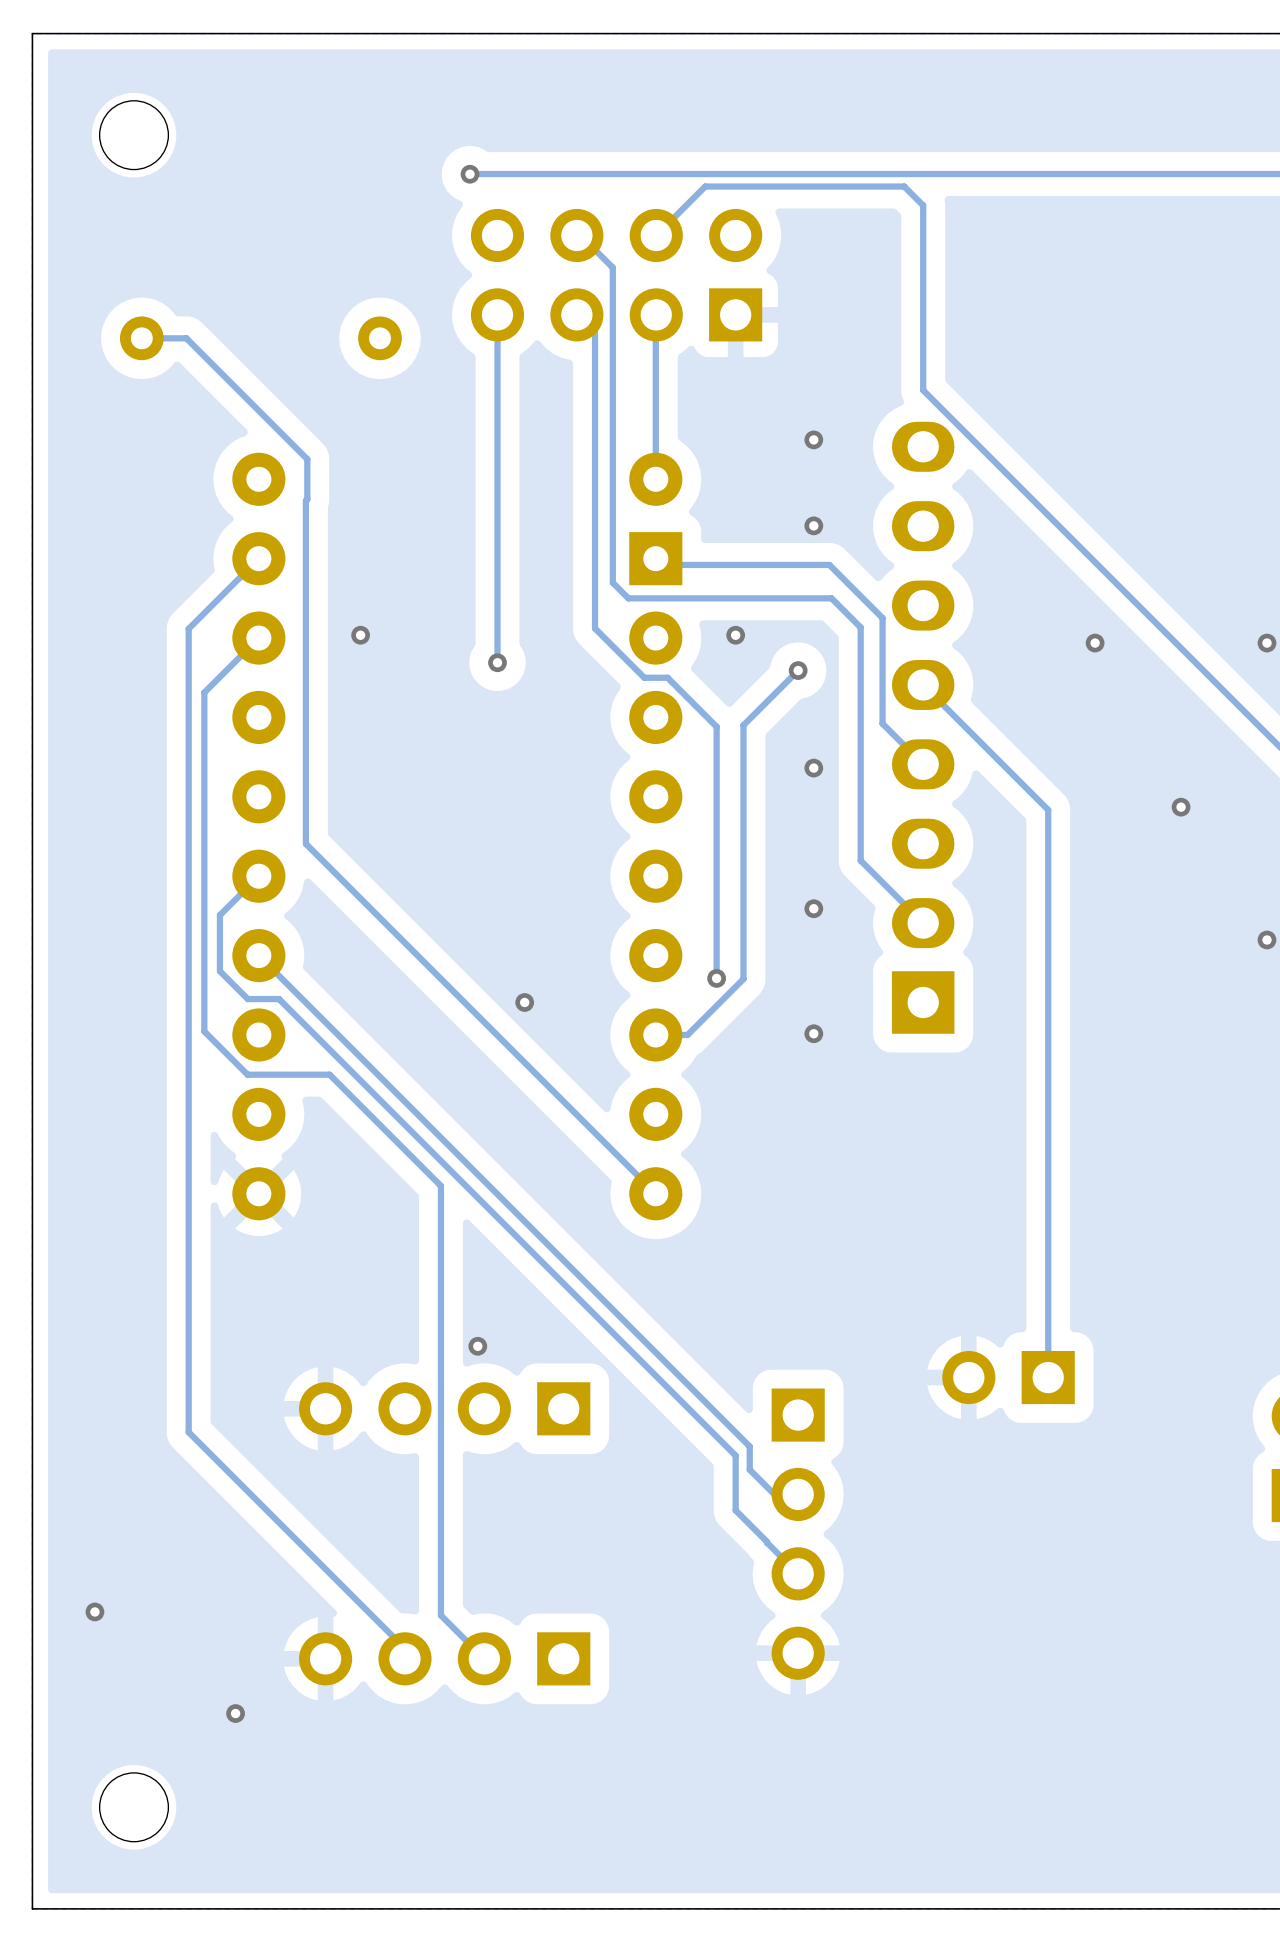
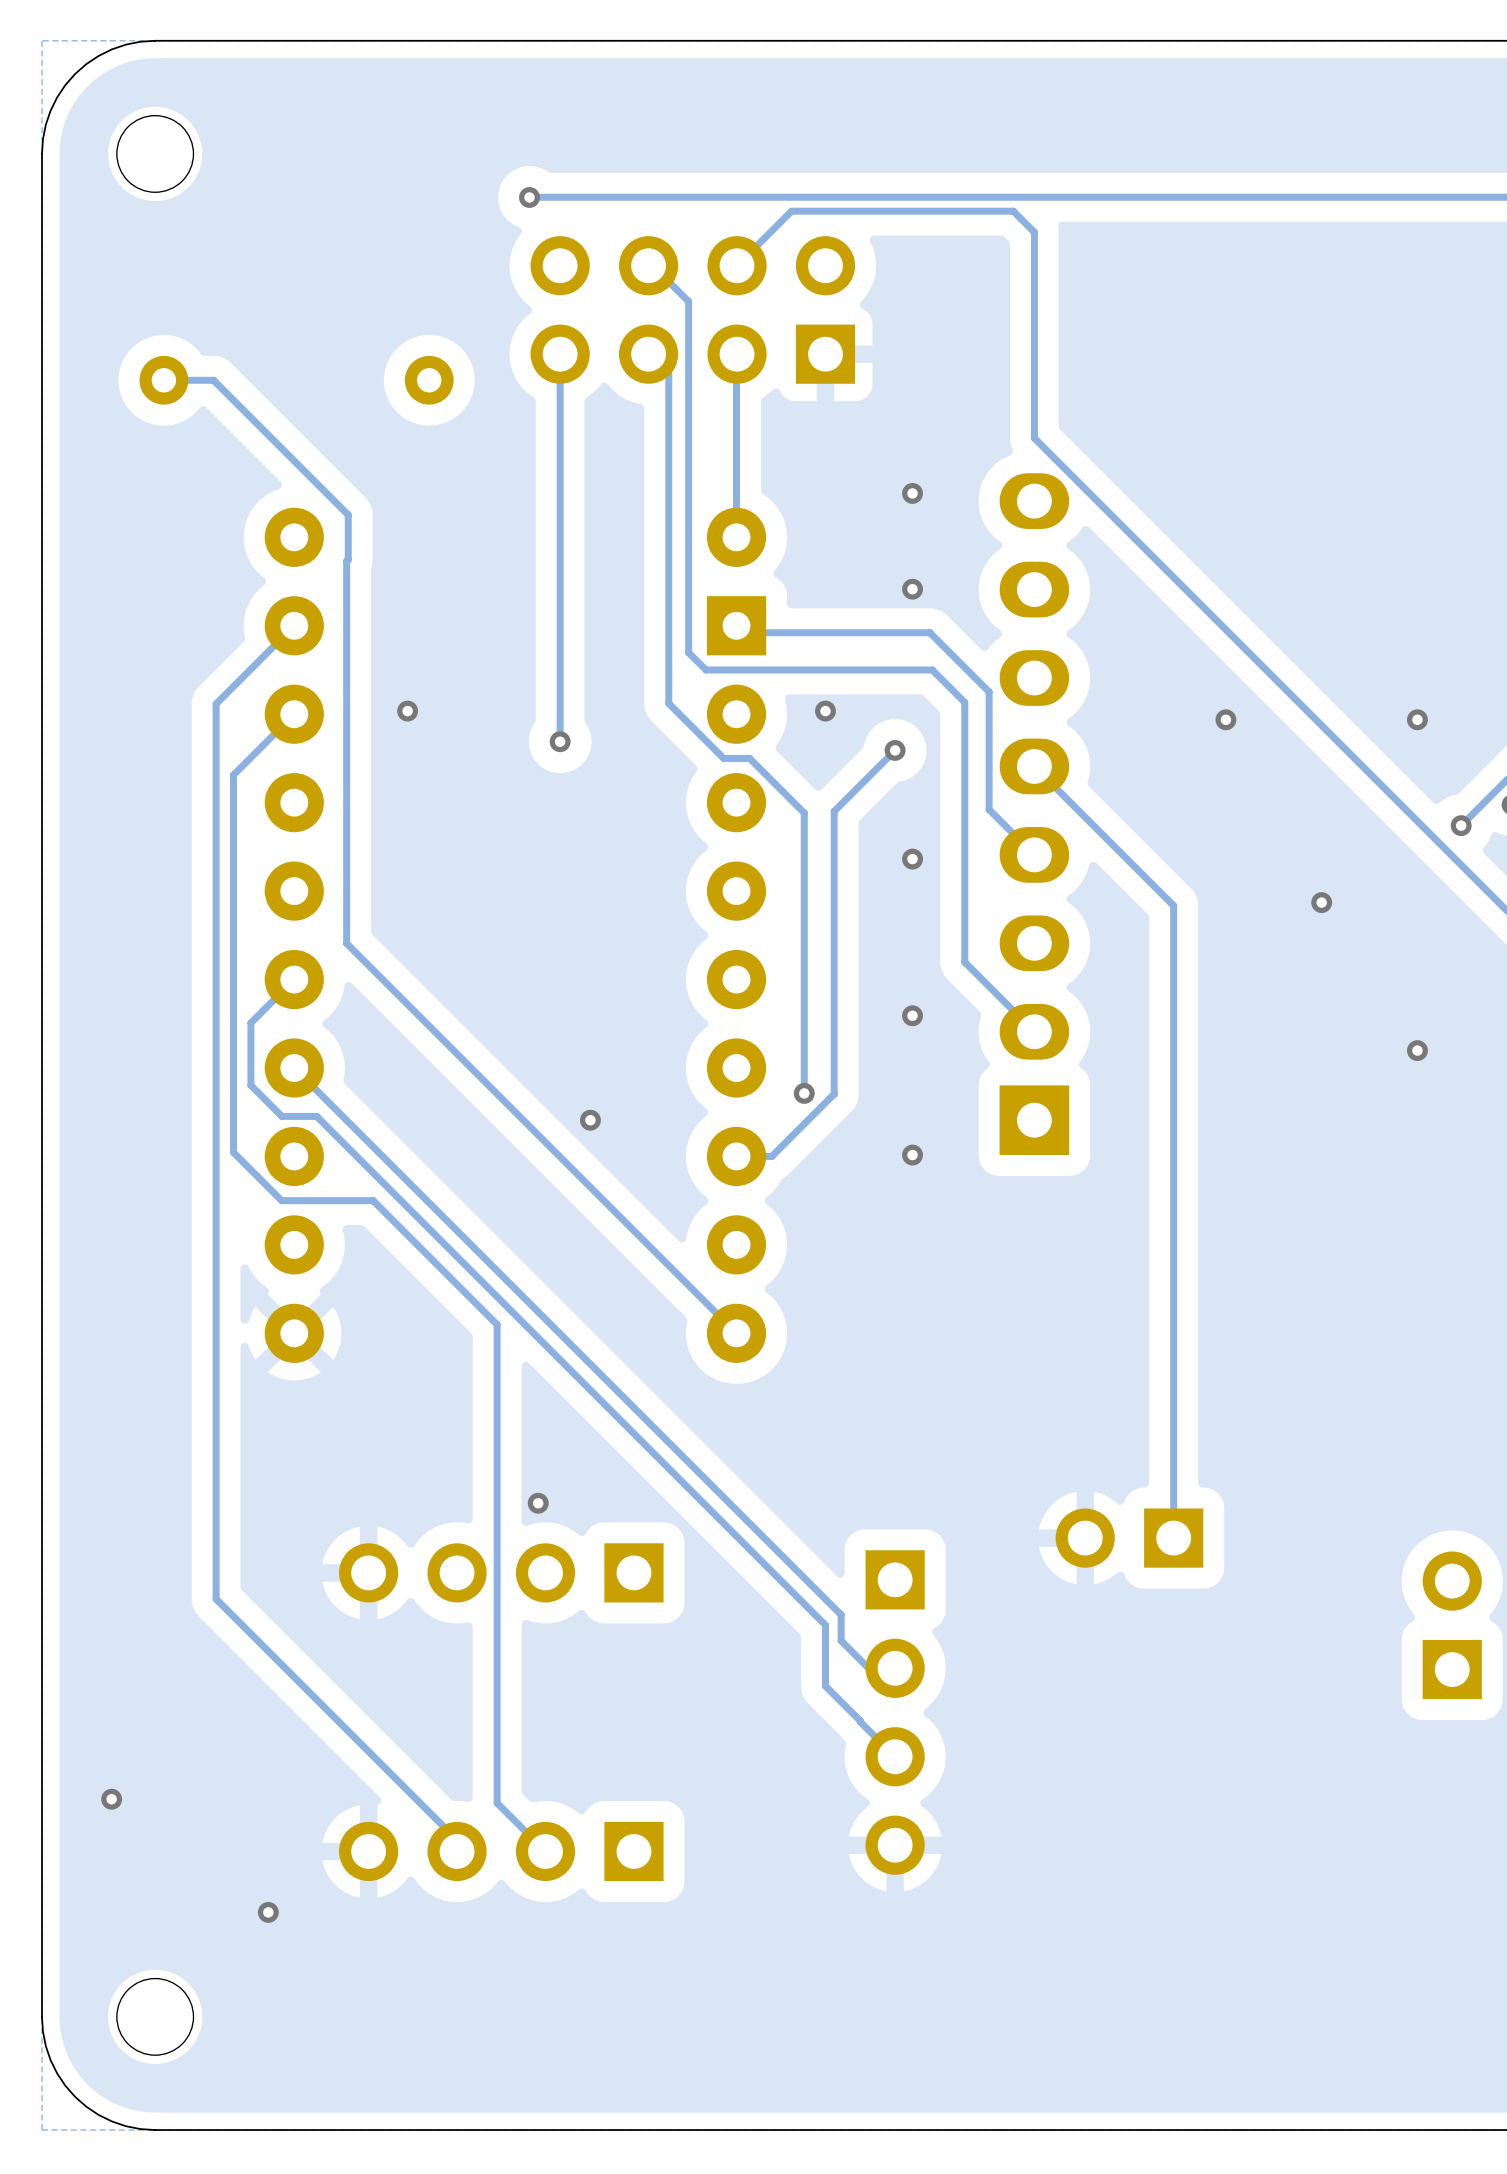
board edge: (134, 33) (32, 33) (32, 135) -> (155, 40) (140, 41) (111, 49) (86, 64) (75, 73) (57, 97) (50, 110) (42, 139) (42, 153)
board edge: (32, 1807) (32, 1908) (134, 1908) -> (42, 2016) (42, 2031) (50, 2060) (65, 2085) (75, 2096) (86, 2106) (111, 2121) (140, 2129) (155, 2130)

